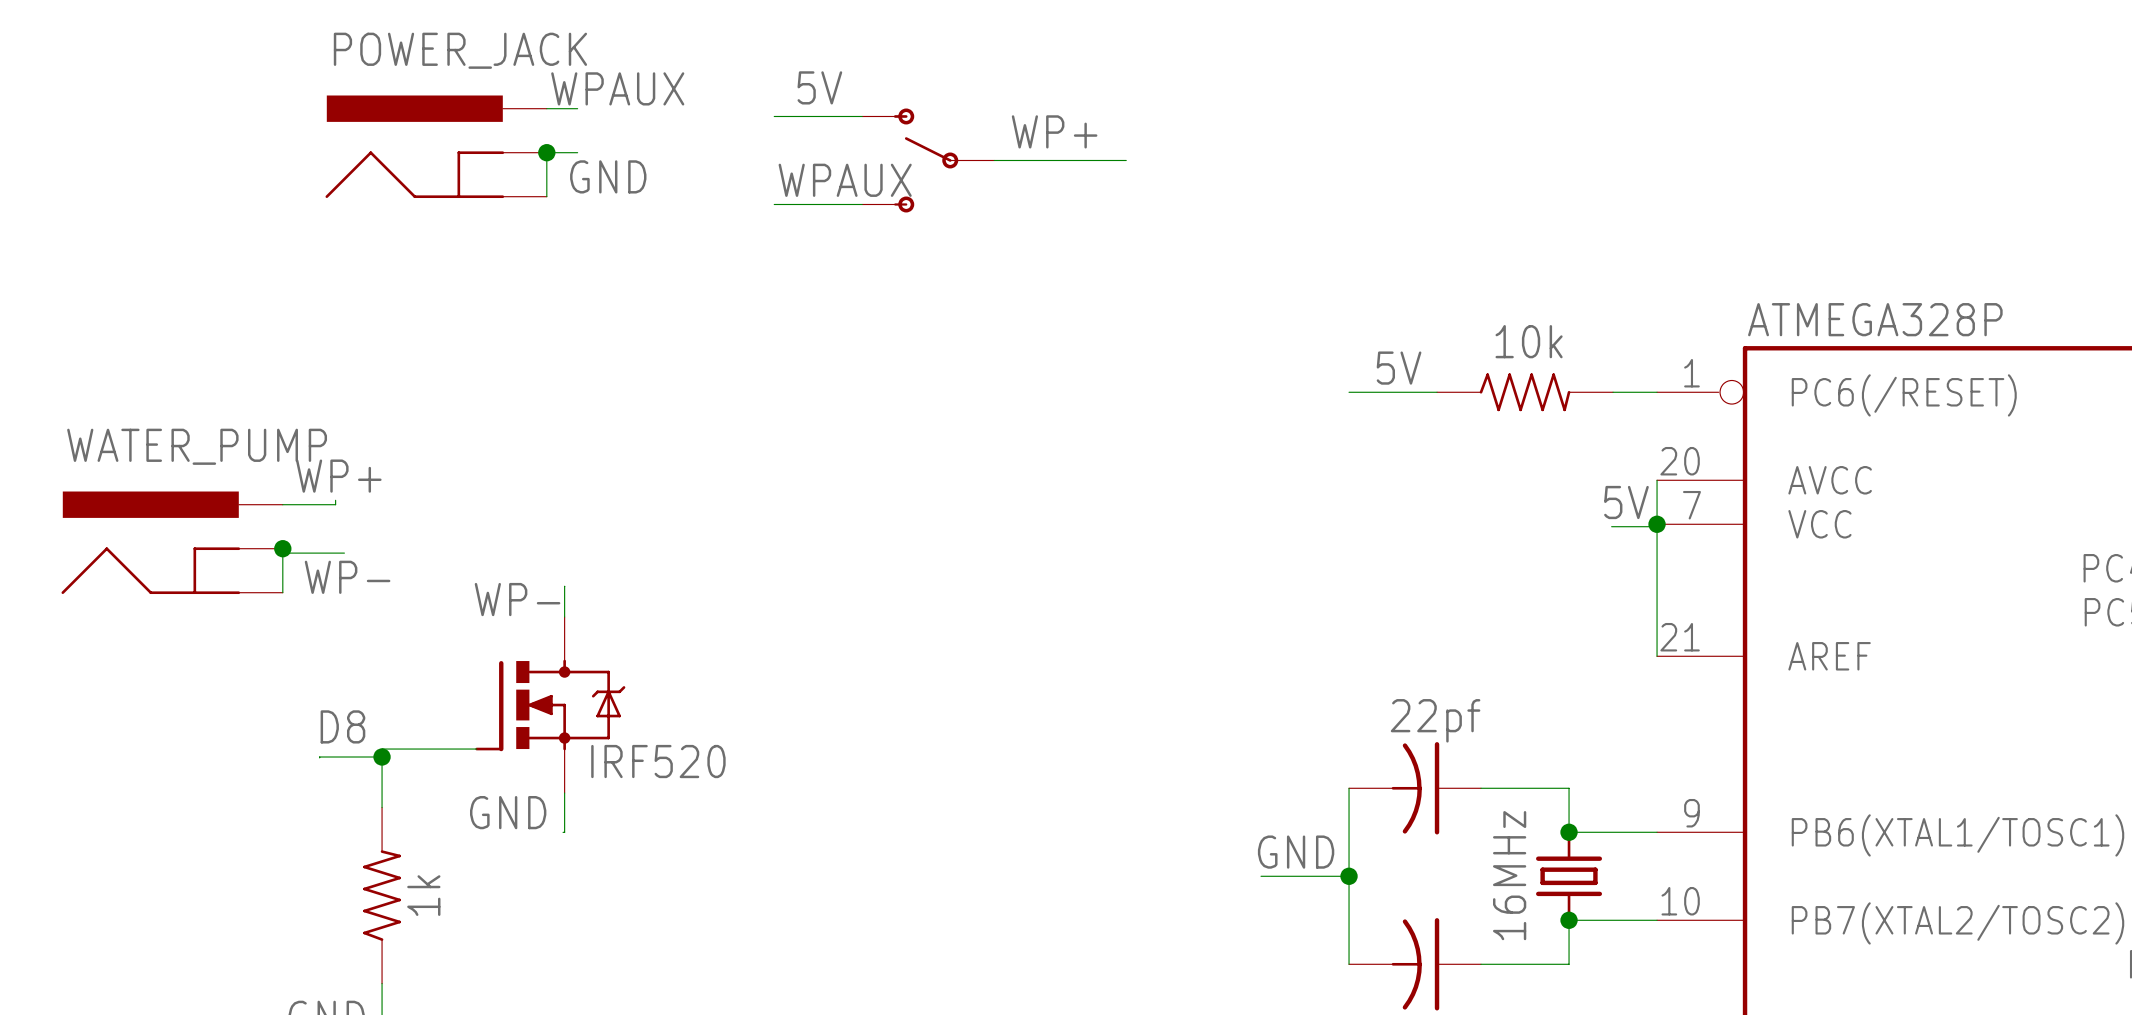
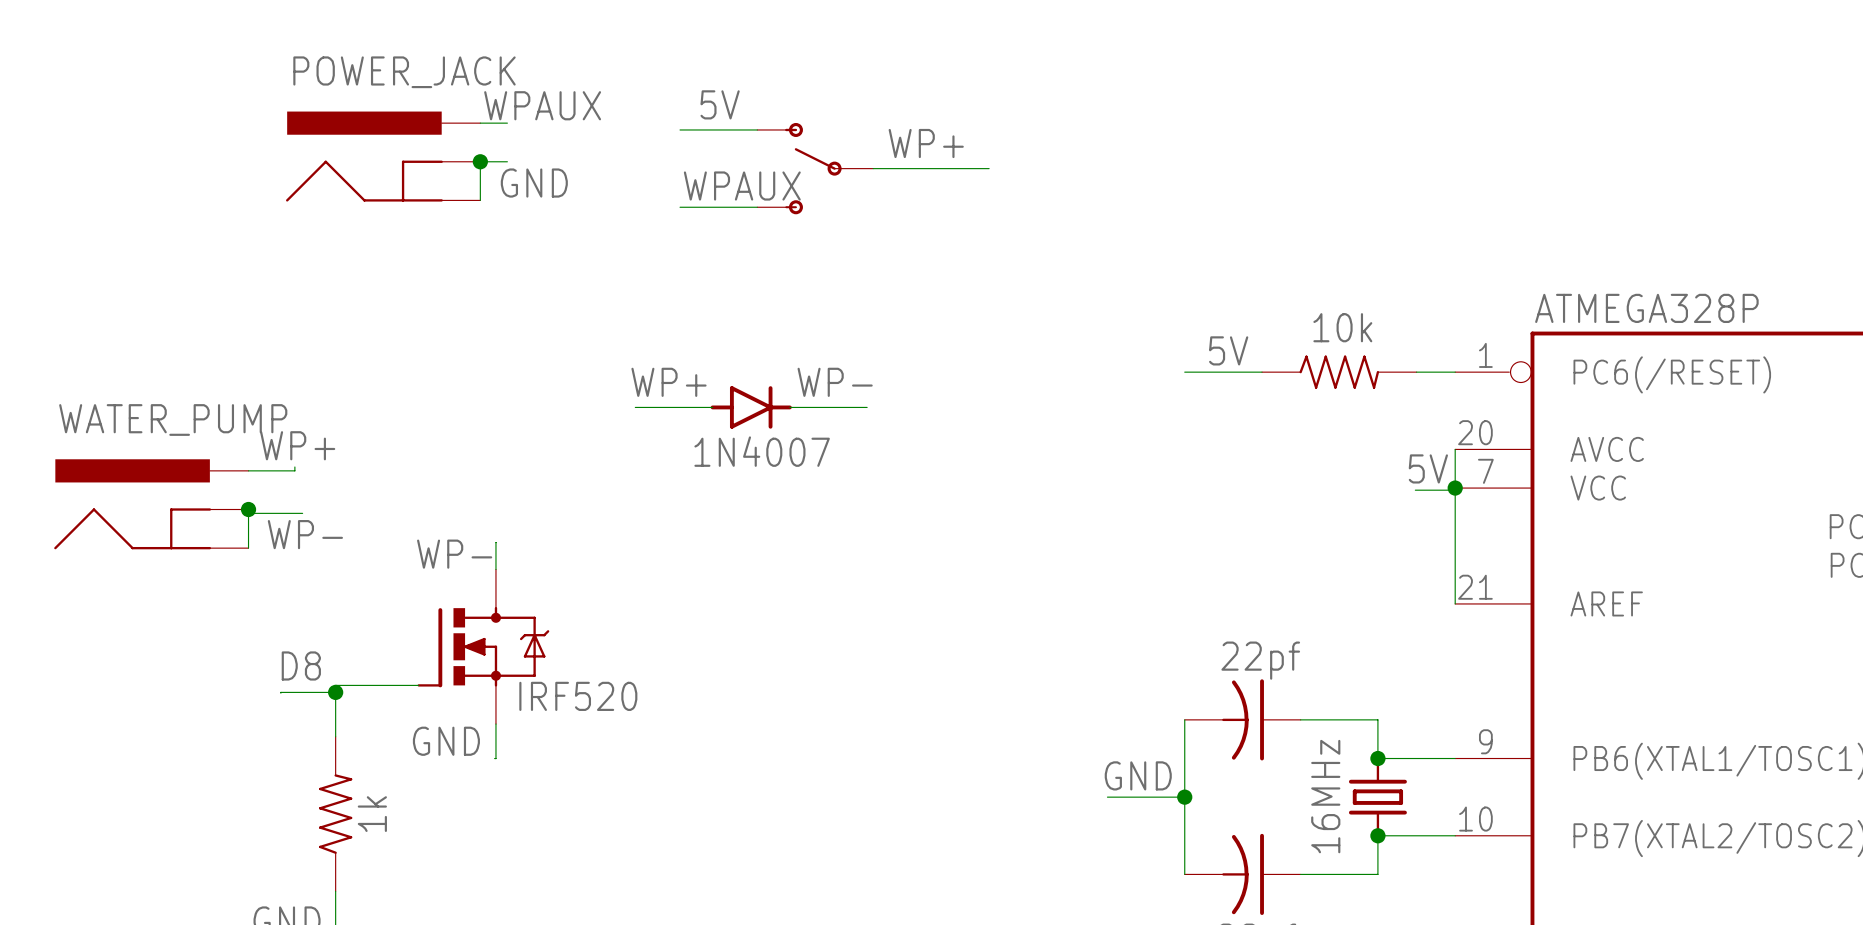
label: none -> WP+ (669, 382)
label: none -> WP- (835, 382)
wire: none -> (635, 407) (712, 407)
part: none -> 1N4007 (751, 407)
wire: none -> (789, 407) (867, 407)

